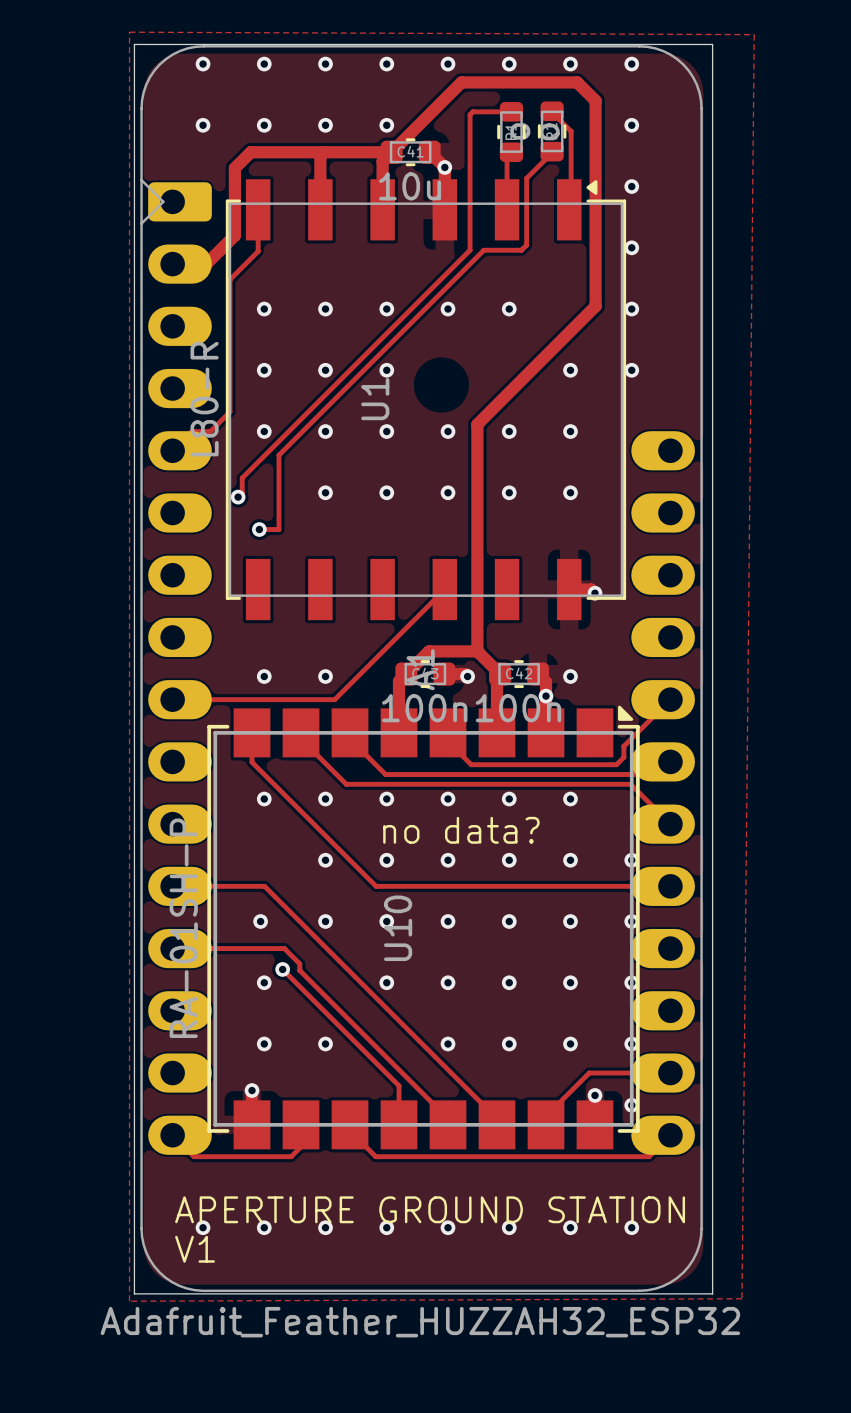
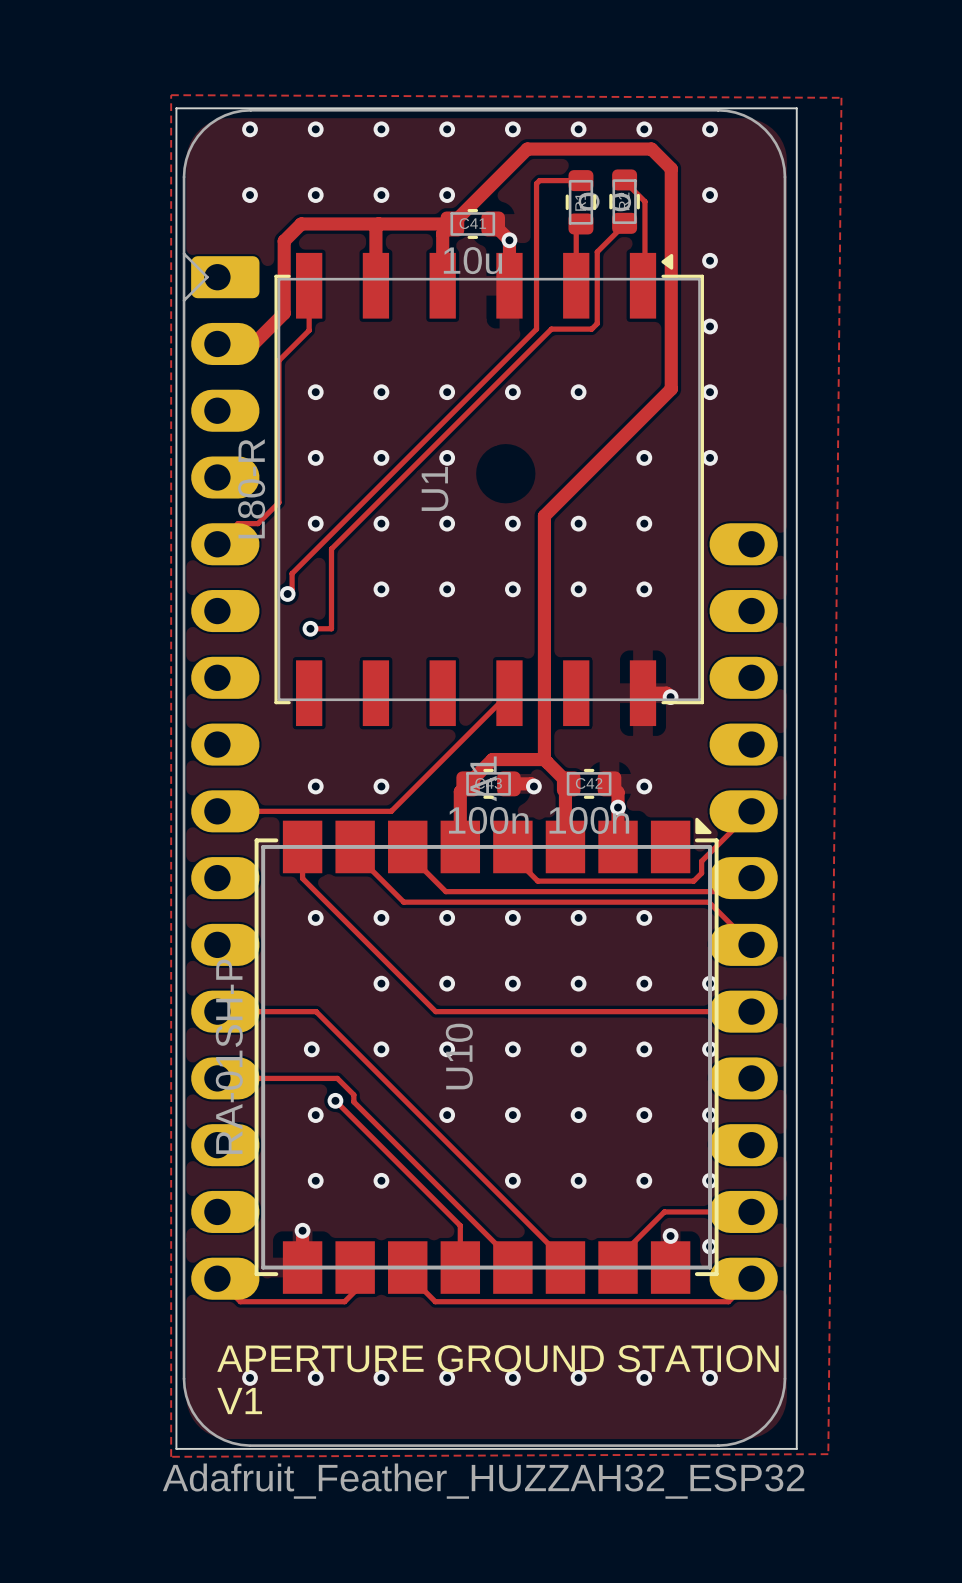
text: no data? (461, 830) -> none

